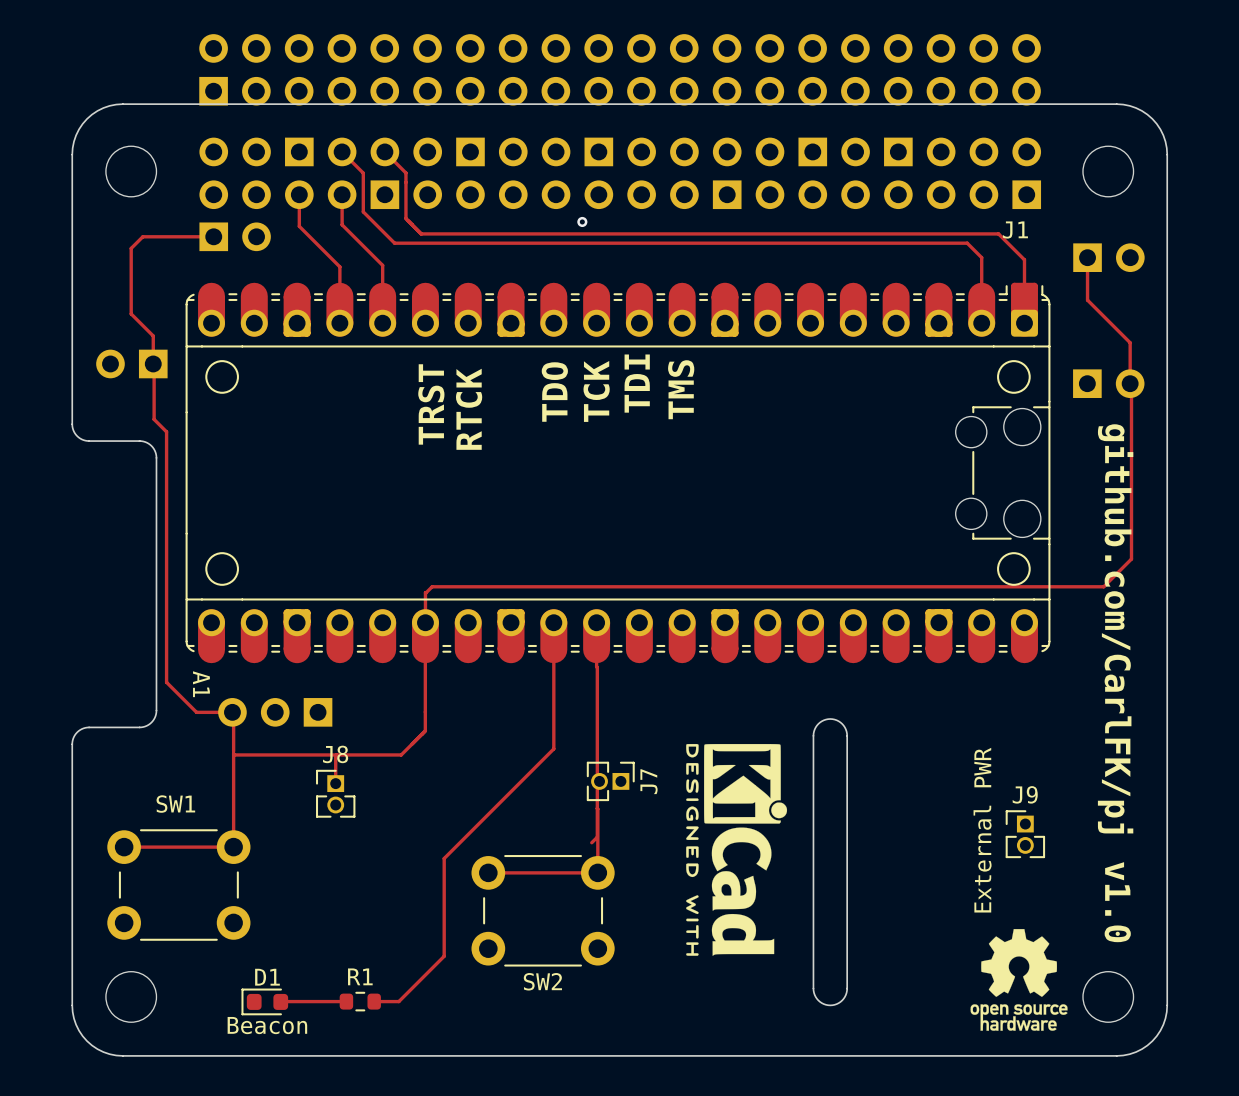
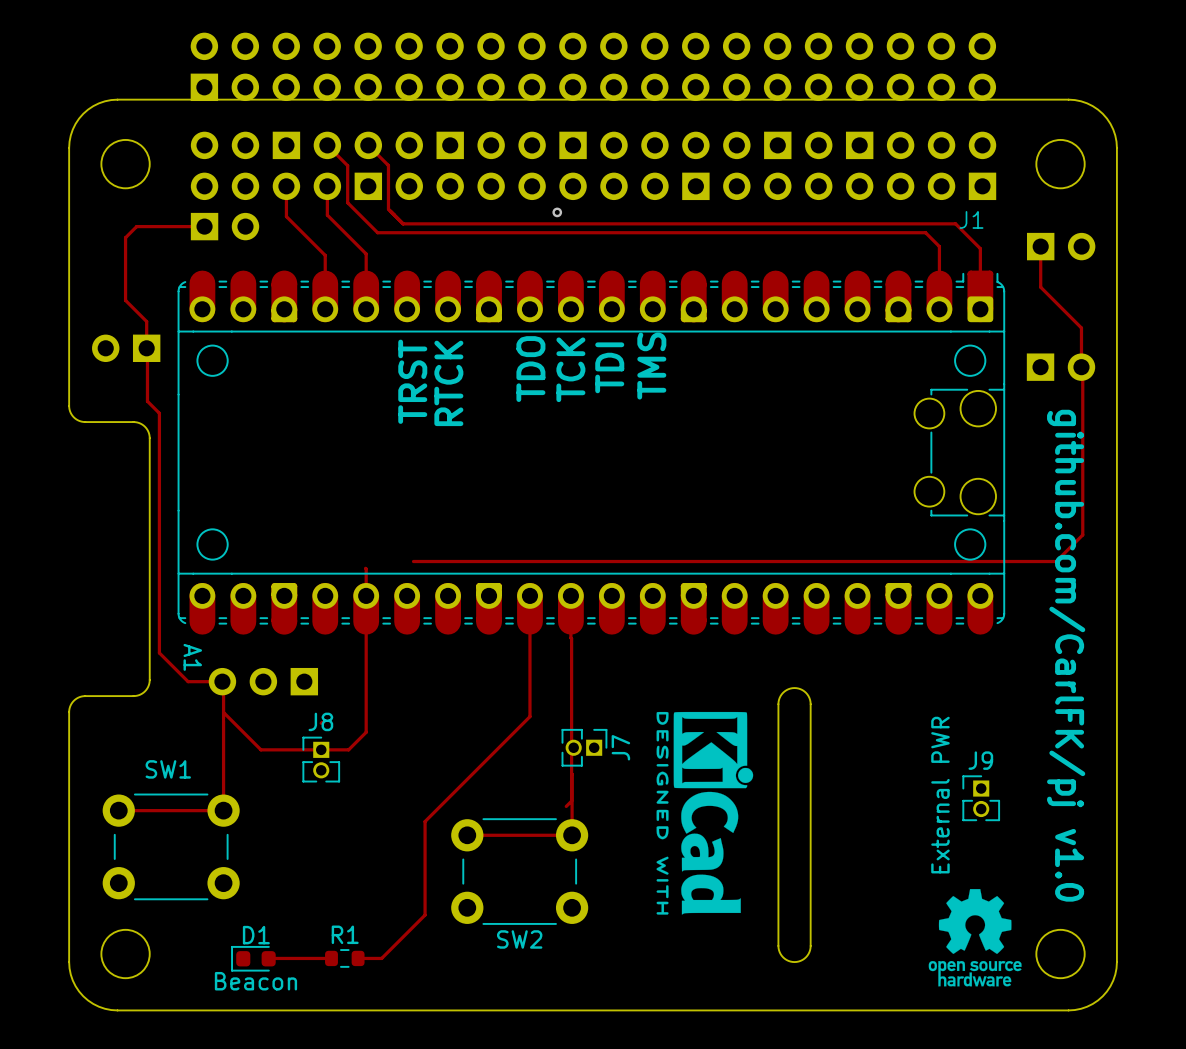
track: (432, 586) (425, 592) (425, 622) -> none
track: none -> (365, 568) (366, 732) (348, 749) (260, 749) (223, 712)
track: (425, 622) (425, 730) -> none
track: (425, 730) (401, 754) (233, 754) -> none
track: (335, 755) (335, 783) -> none

